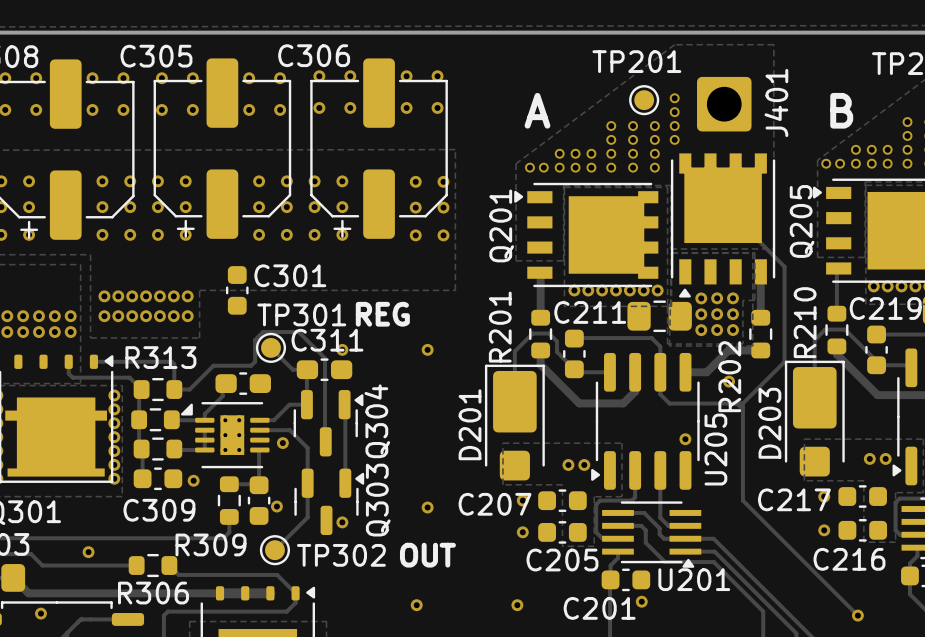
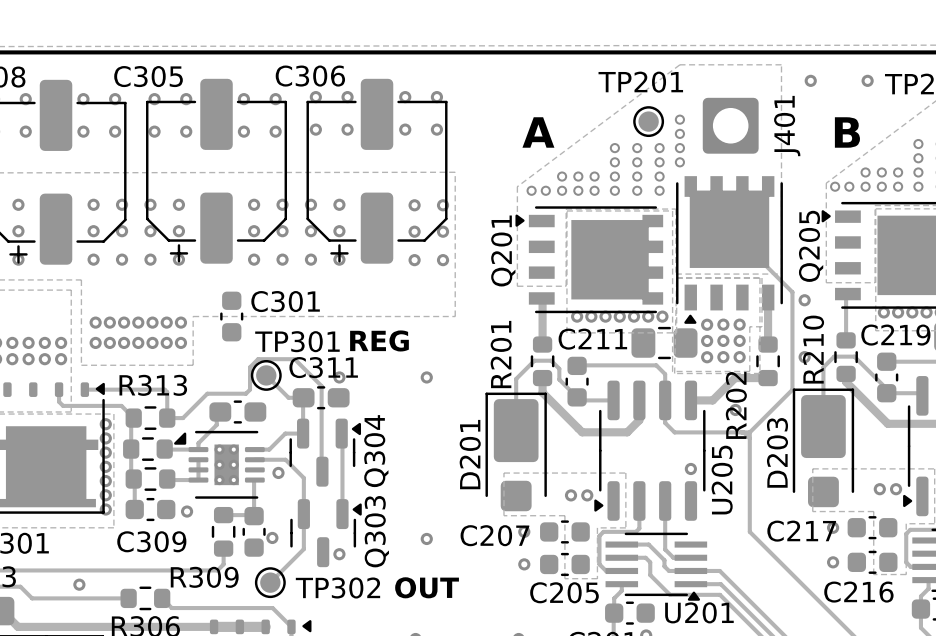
via: none -> (810, 80)
via: none -> (867, 80)
via: none -> (804, 300)
via: none -> (804, 357)

